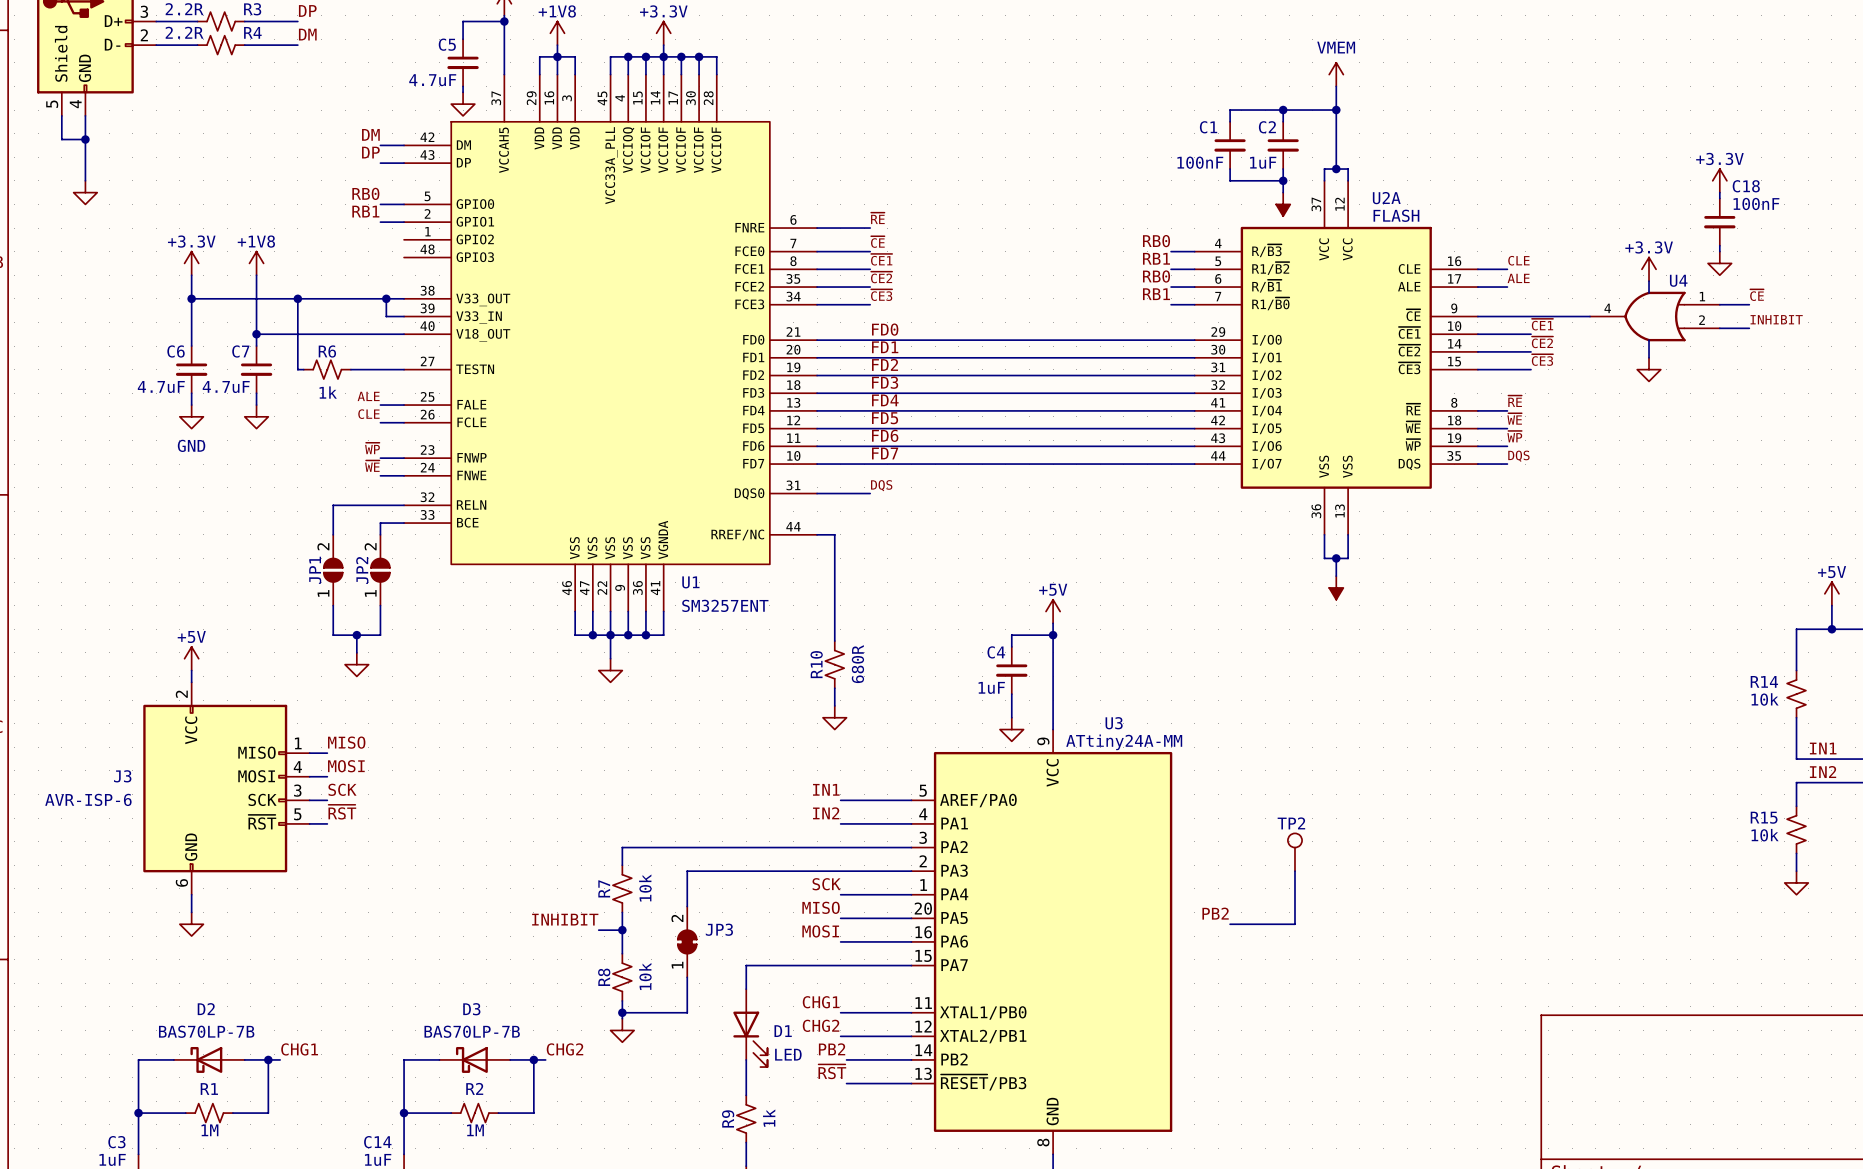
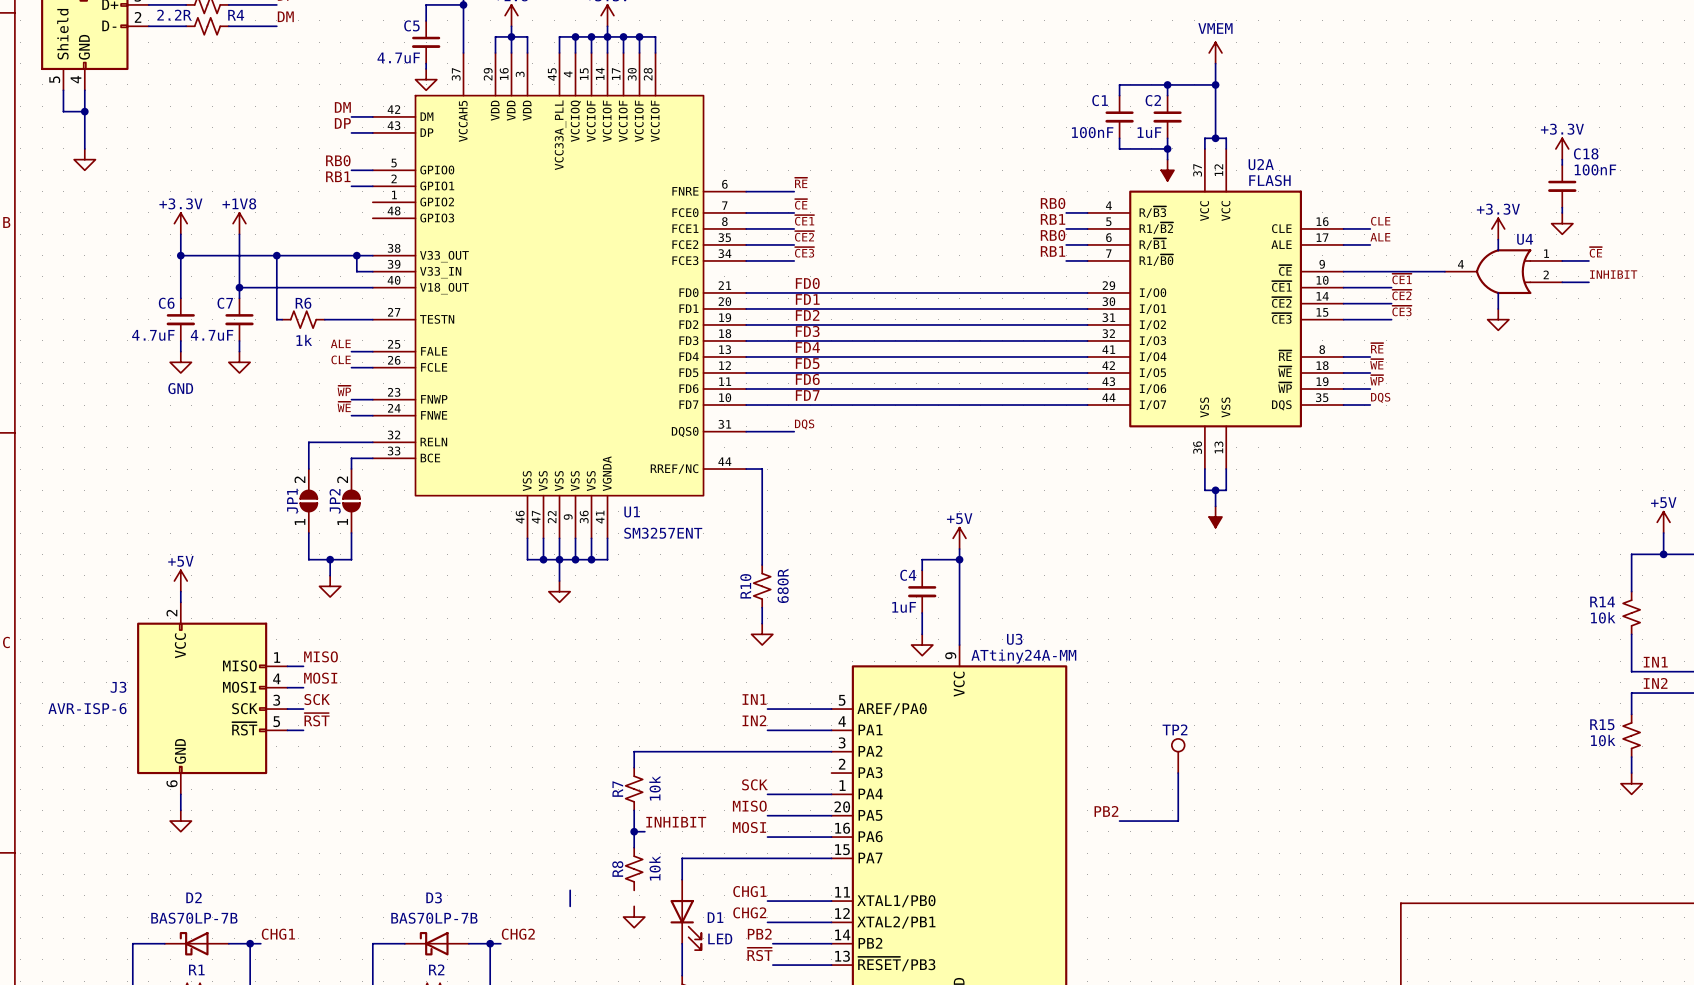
wire: (693, 847) (622, 847) (622, 865) -> (634, 751) (634, 767)
wire: (911, 871) (687, 871) (687, 906) -> none
R7 position: (622, 888) -> (634, 789)
wire: (622, 912) (622, 953) -> (634, 810) (634, 847)
label position: INHIBIT (565, 919) -> INHIBIT (676, 822)
wire: (598, 930) (622, 930) -> none
junction: (622, 930) -> none
wire: none -> (634, 831) (644, 831)
junction: none -> (634, 831)
JP3: (687, 941) -> none
R8 position: (622, 977) -> (634, 869)
wire: (687, 977) (687, 1012) (622, 1012) -> none
junction: (622, 1012) -> none
power symbol position: (622, 1030) -> (634, 917)

